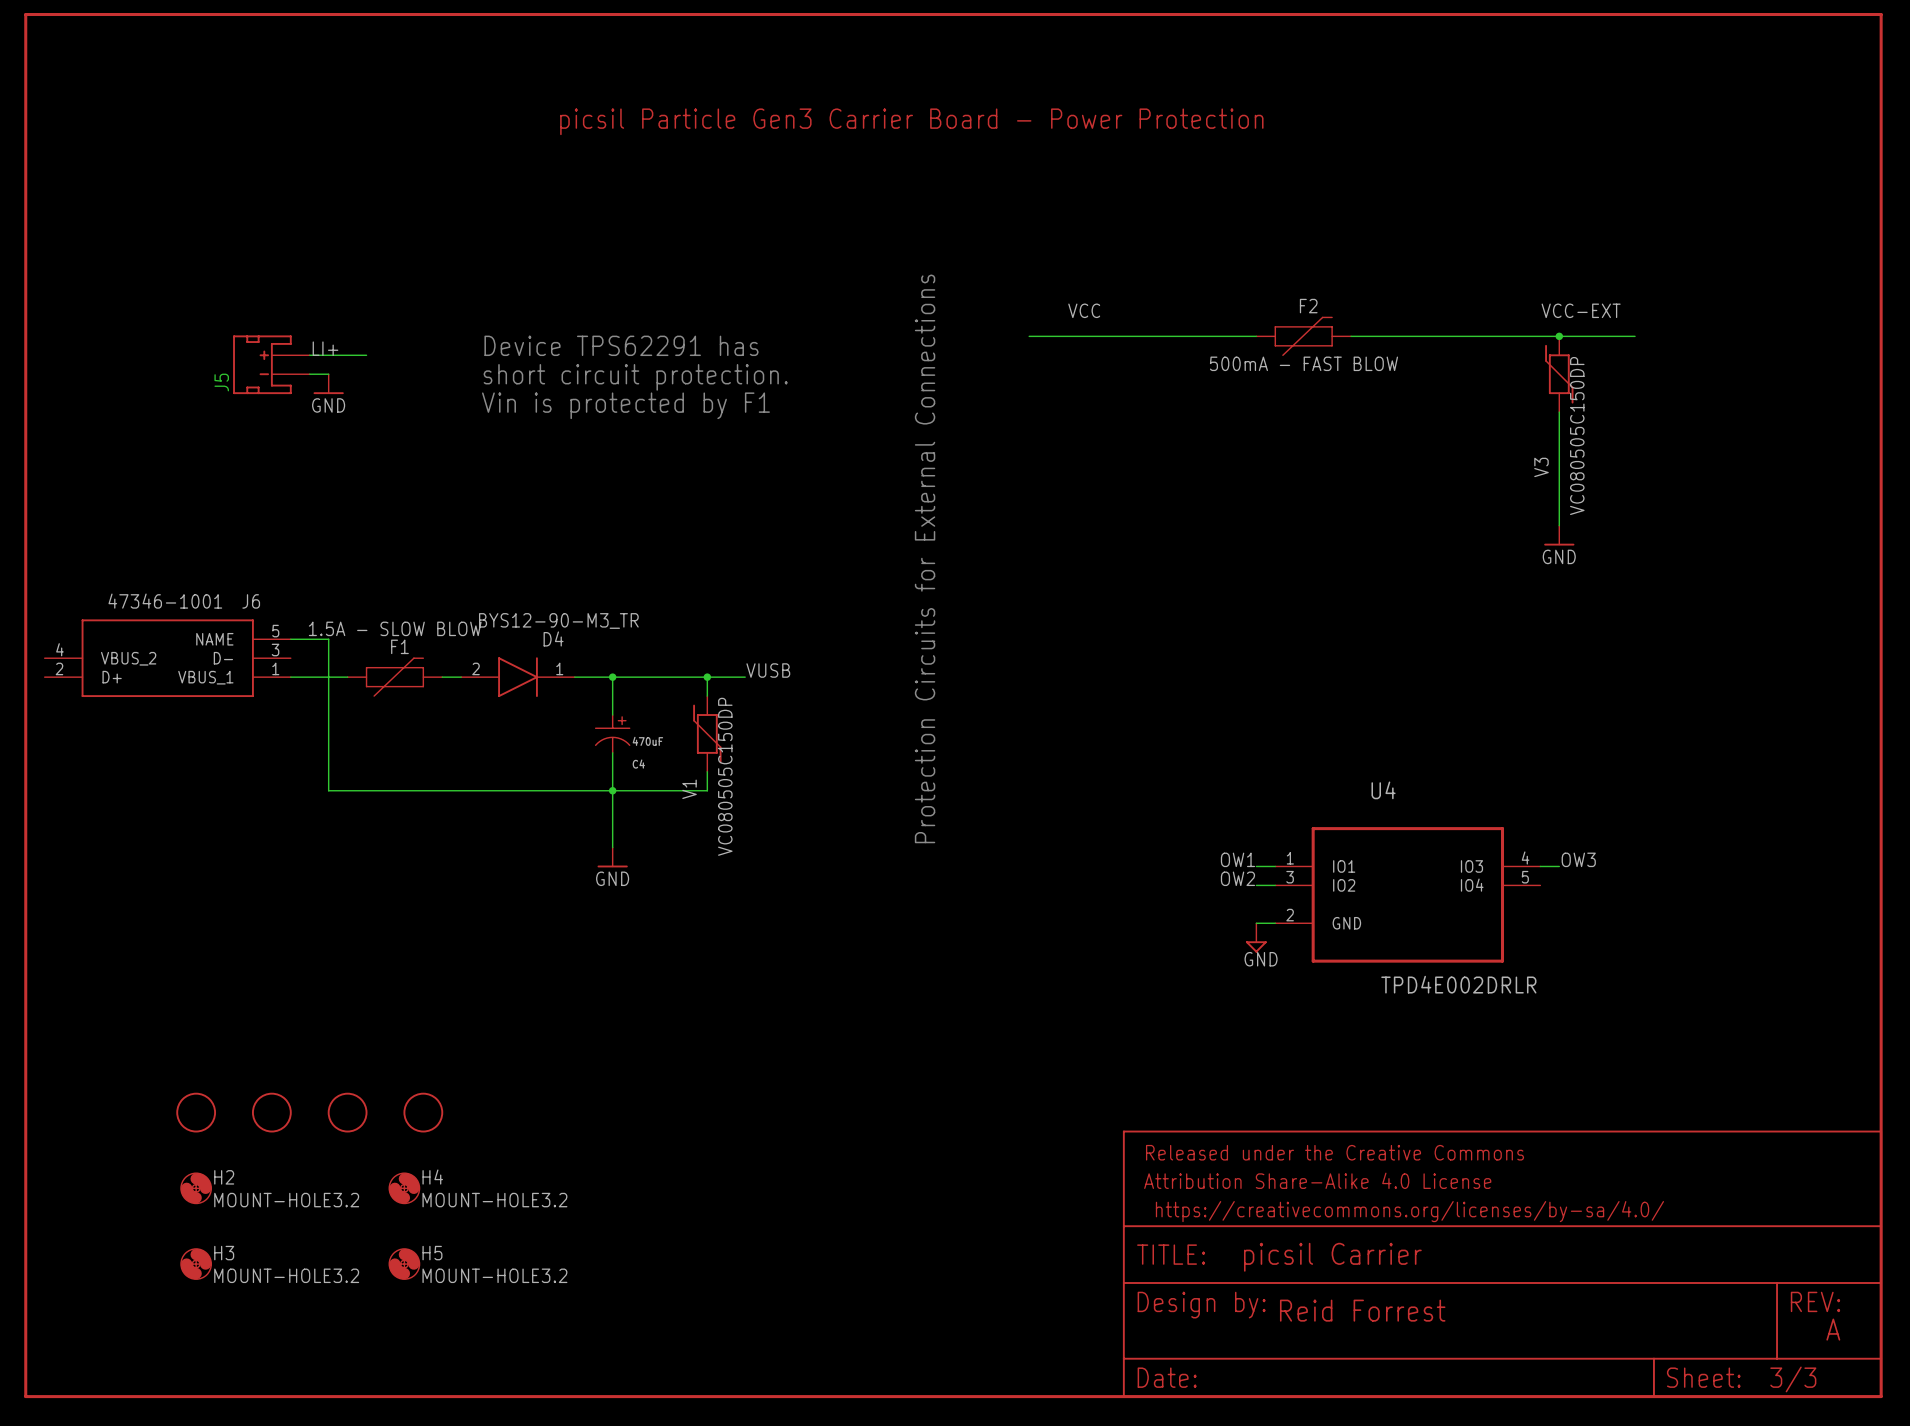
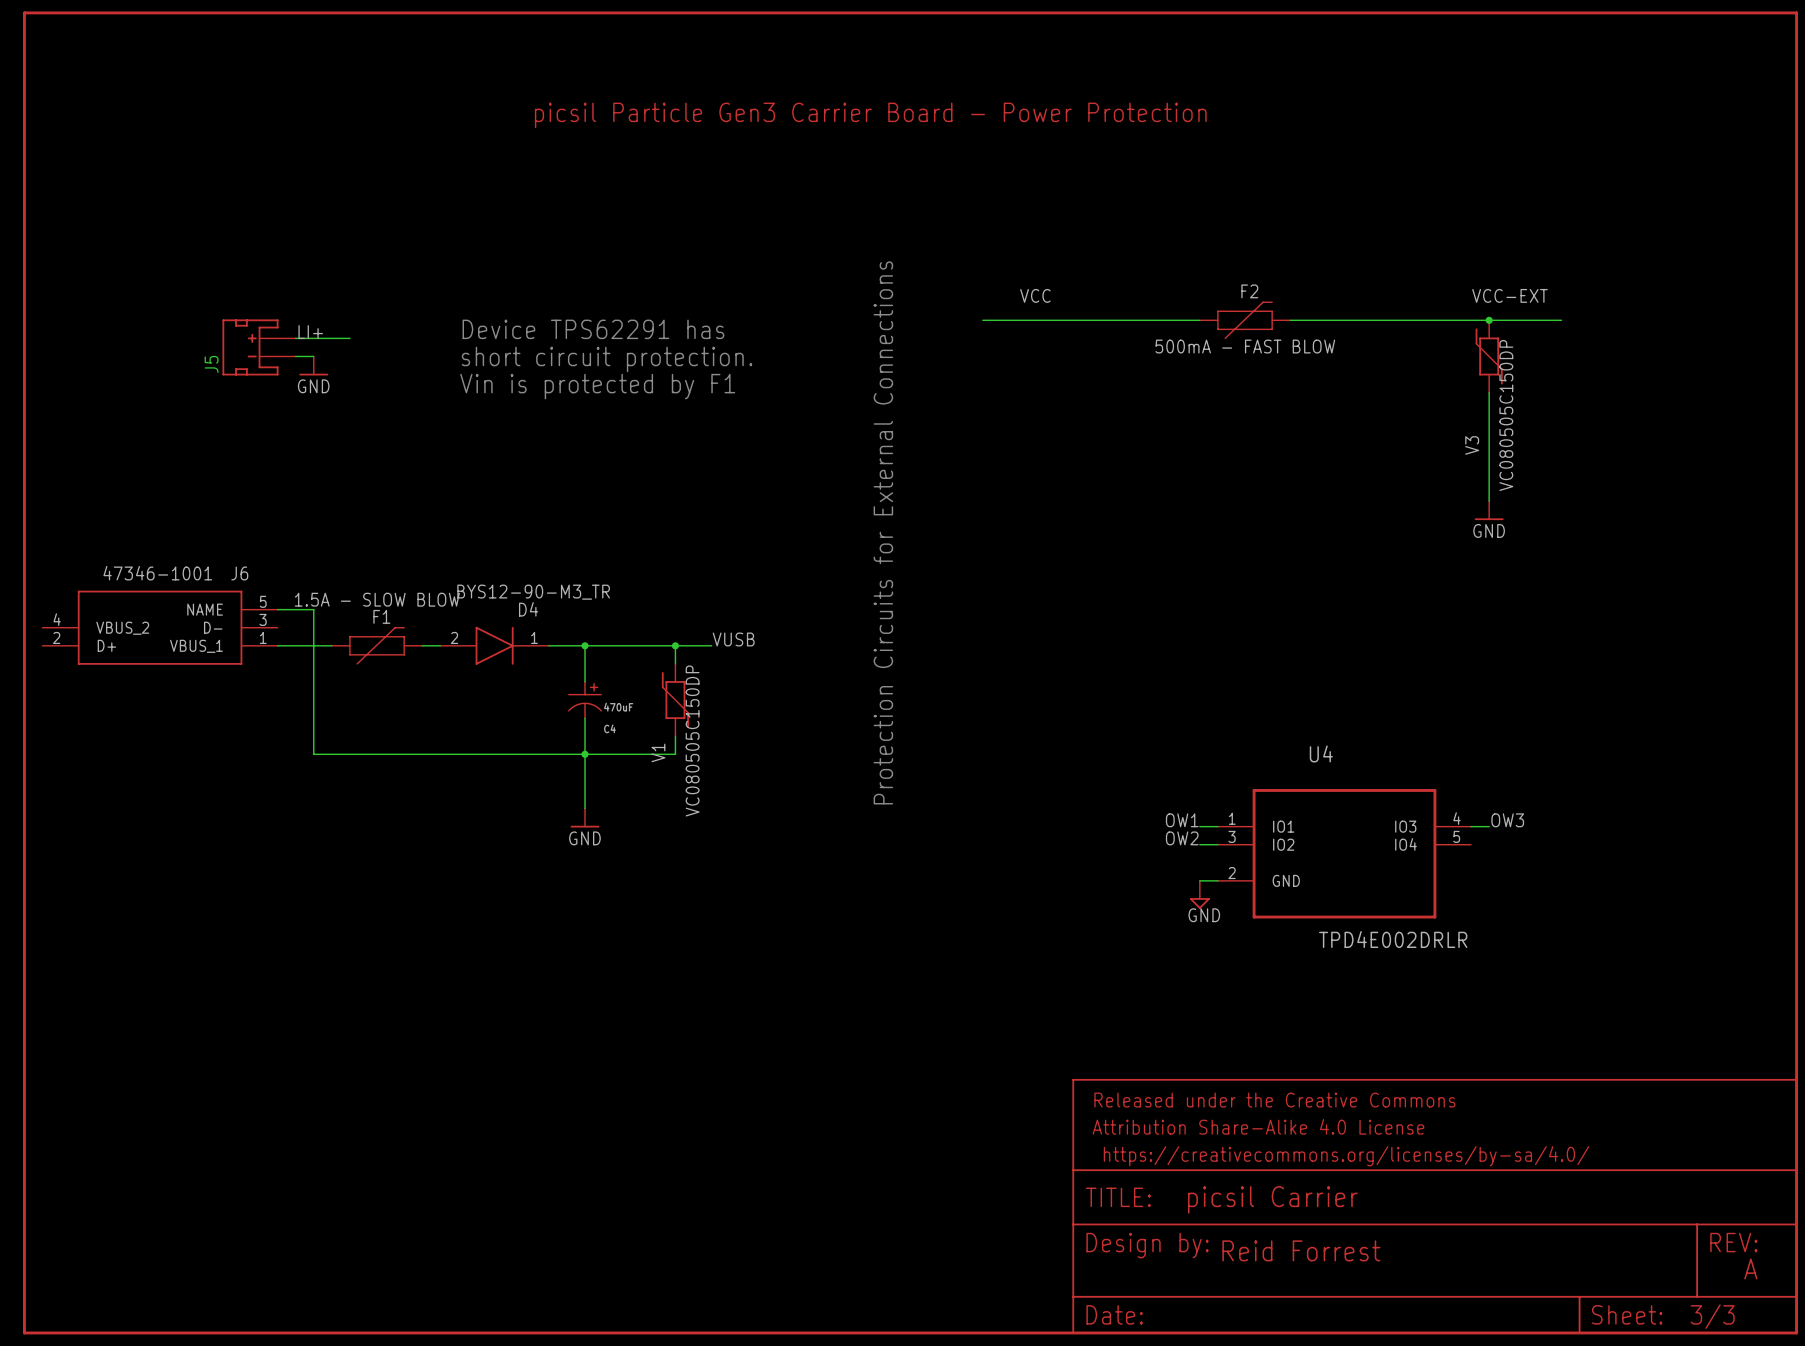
part: (196, 1112) -> none
part: (271, 1112) -> none
part: (347, 1112) -> none
part: (423, 1112) -> none
H2: MOUNT-HOLE3.2 (196, 1188) -> none
H4: MOUNT-HOLE3.2 (404, 1188) -> none
H3: MOUNT-HOLE3.2 (196, 1264) -> none
H5: MOUNT-HOLE3.2 (404, 1264) -> none

